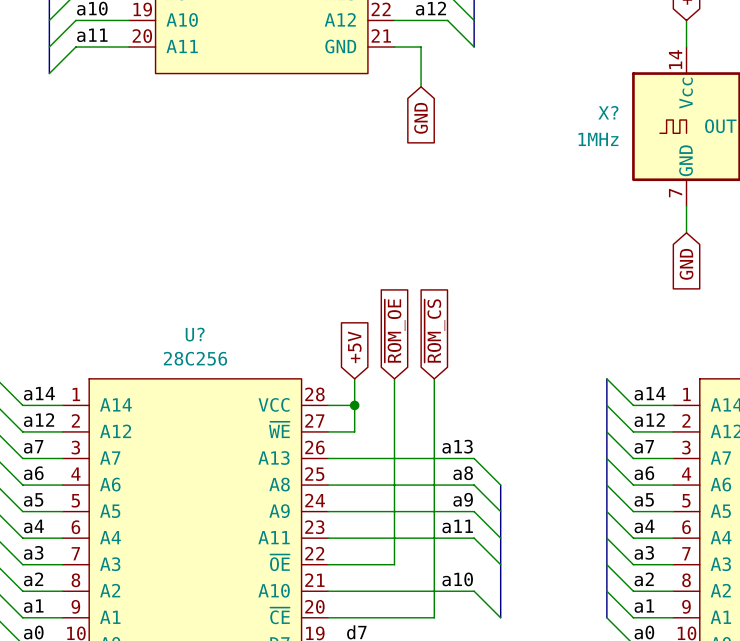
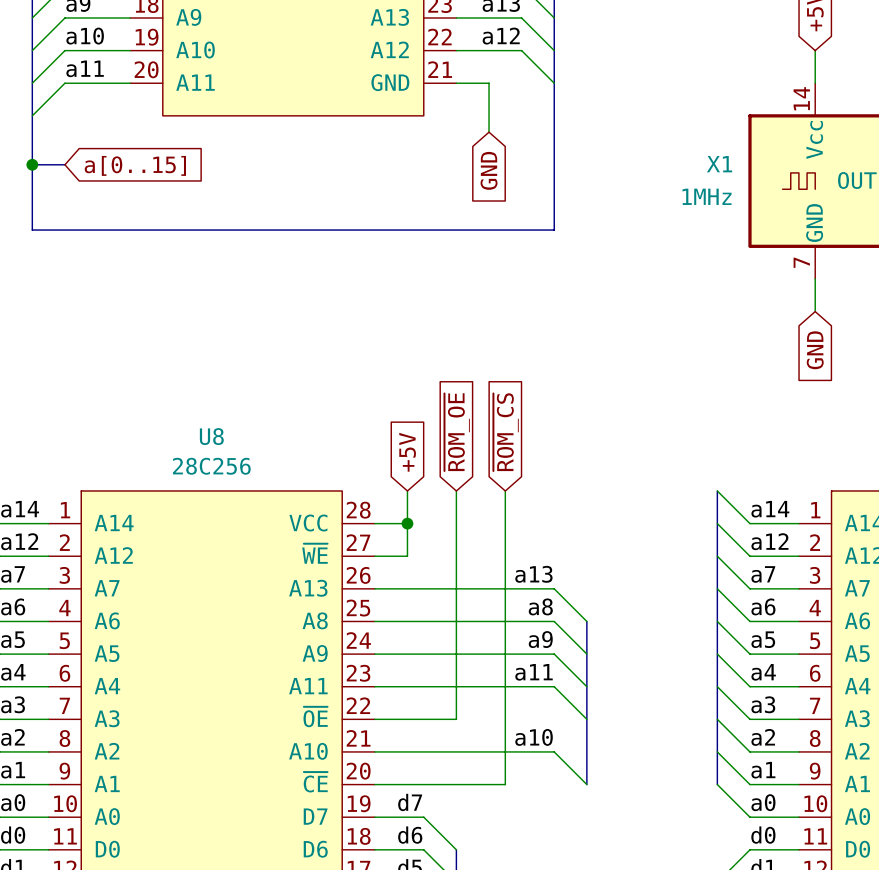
bus: none -> (554, 83) (554, 230) (32, 230) (32, 115)
X? name: X? (608, 112) -> X1 (719, 164)
bus: none -> (32, 164) (64, 164)
junction: none -> (32, 164)
global label: none -> a[0..15] (135, 165)
U? name: U? (195, 334) -> U8 (211, 436)

